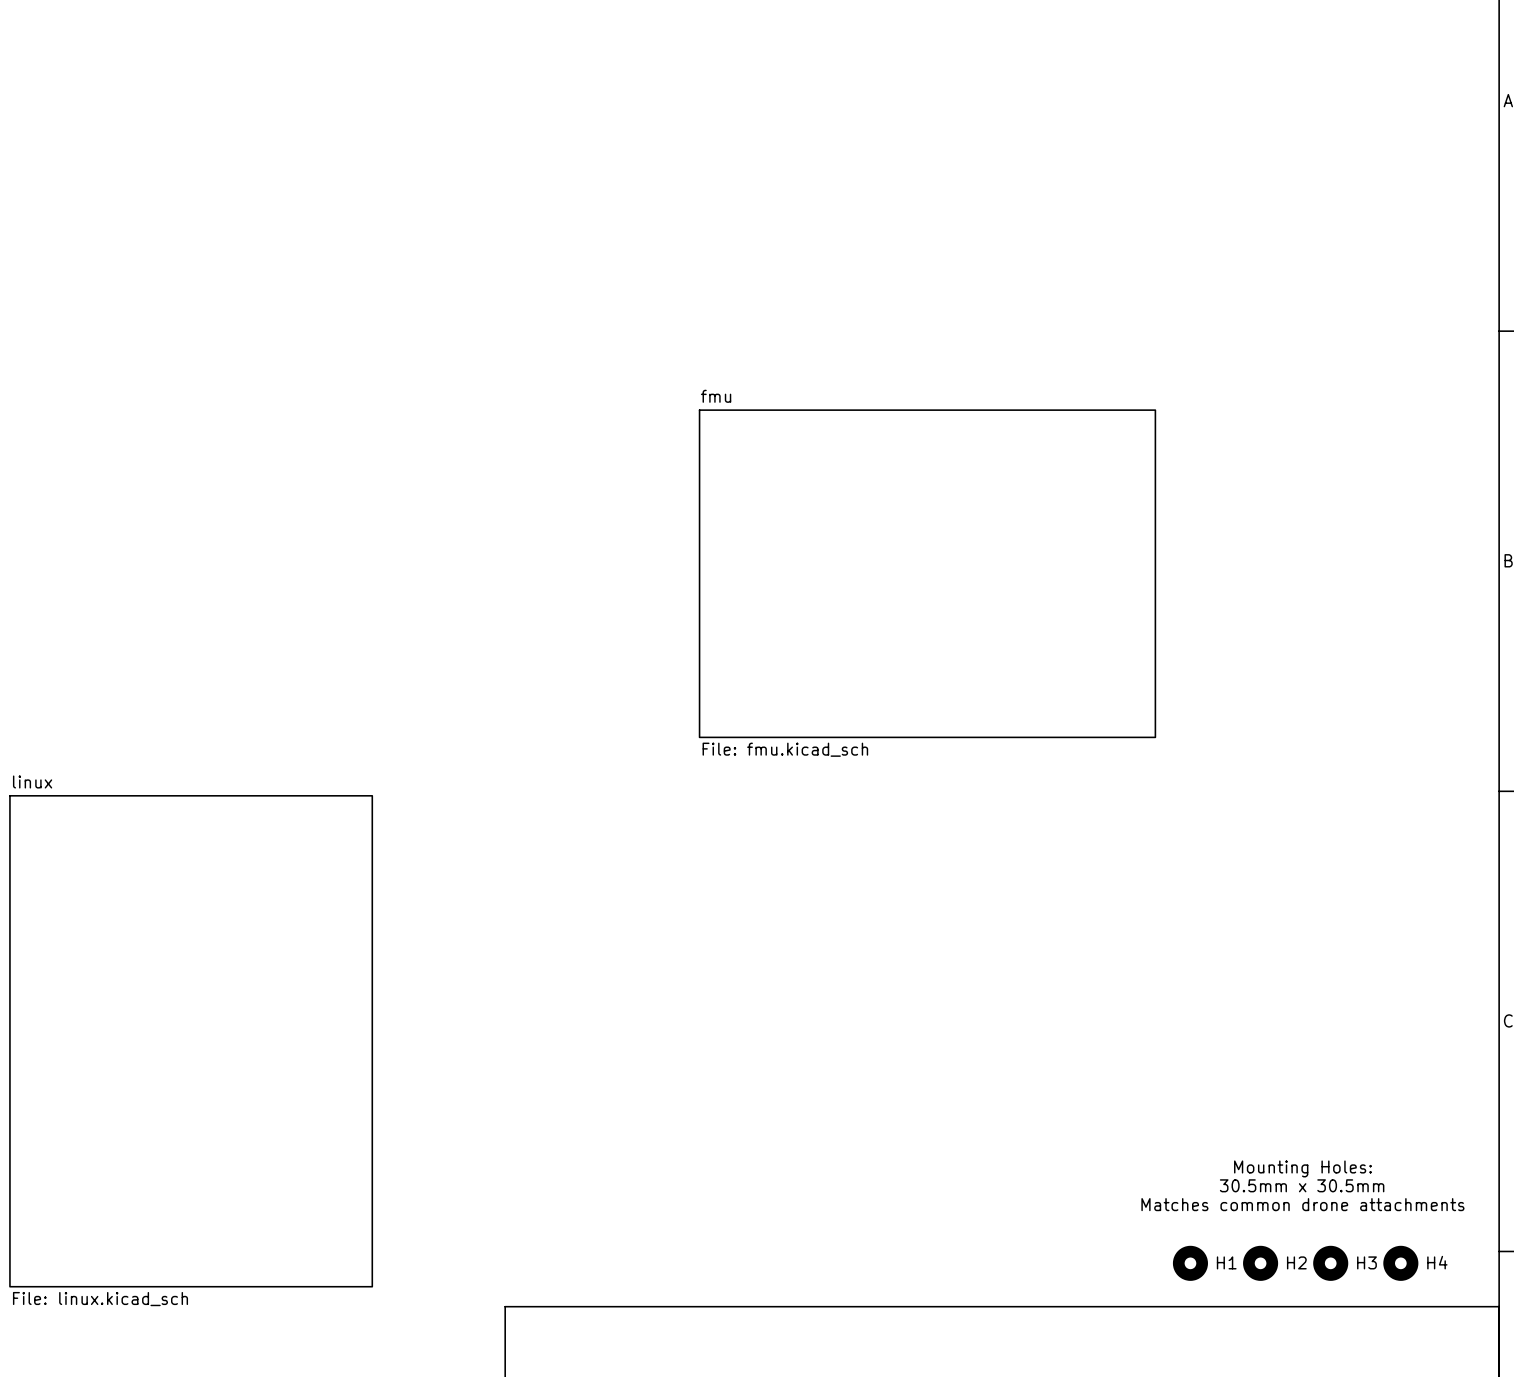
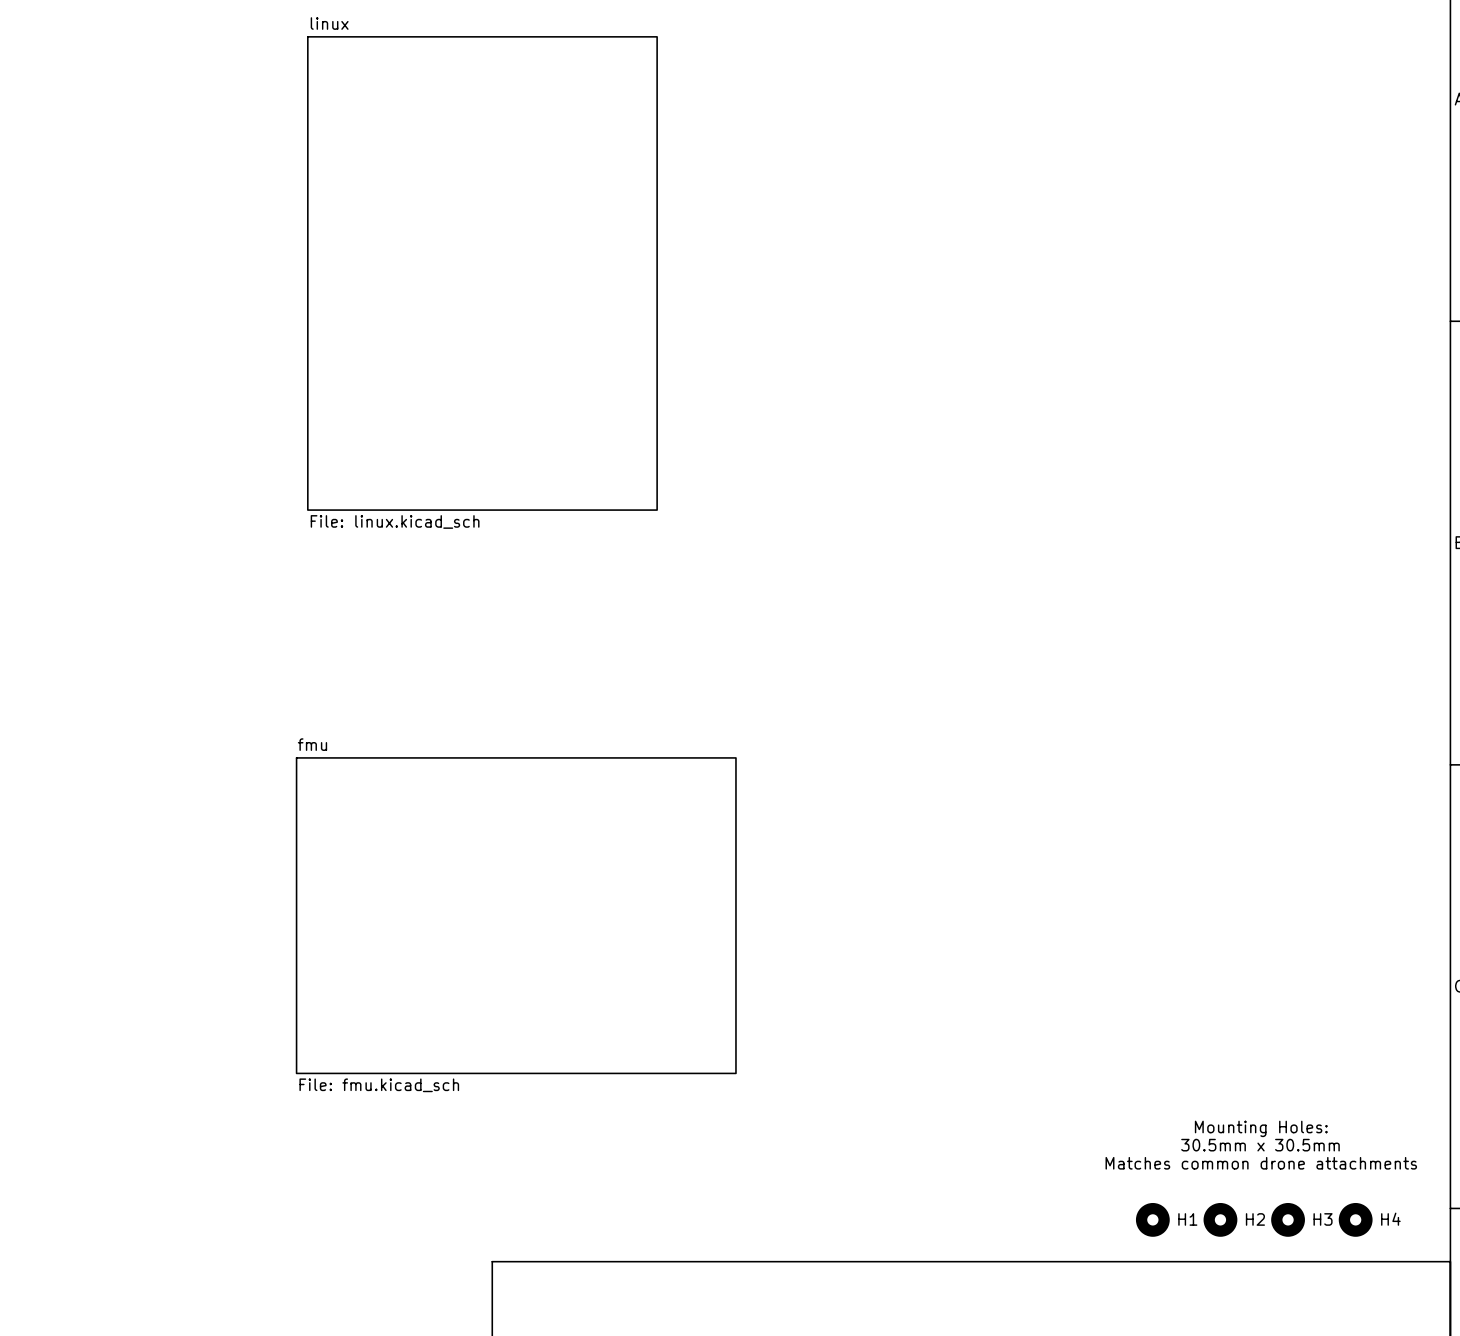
sheet linux: none -> File: linux.kicad_sch (482, 273)
sheet fmu: File: fmu.kicad_sch (927, 573) -> none
sheet fmu: none -> File: fmu.kicad_sch (516, 915)
sheet linux: File: linux.kicad_sch (191, 1041) -> none

